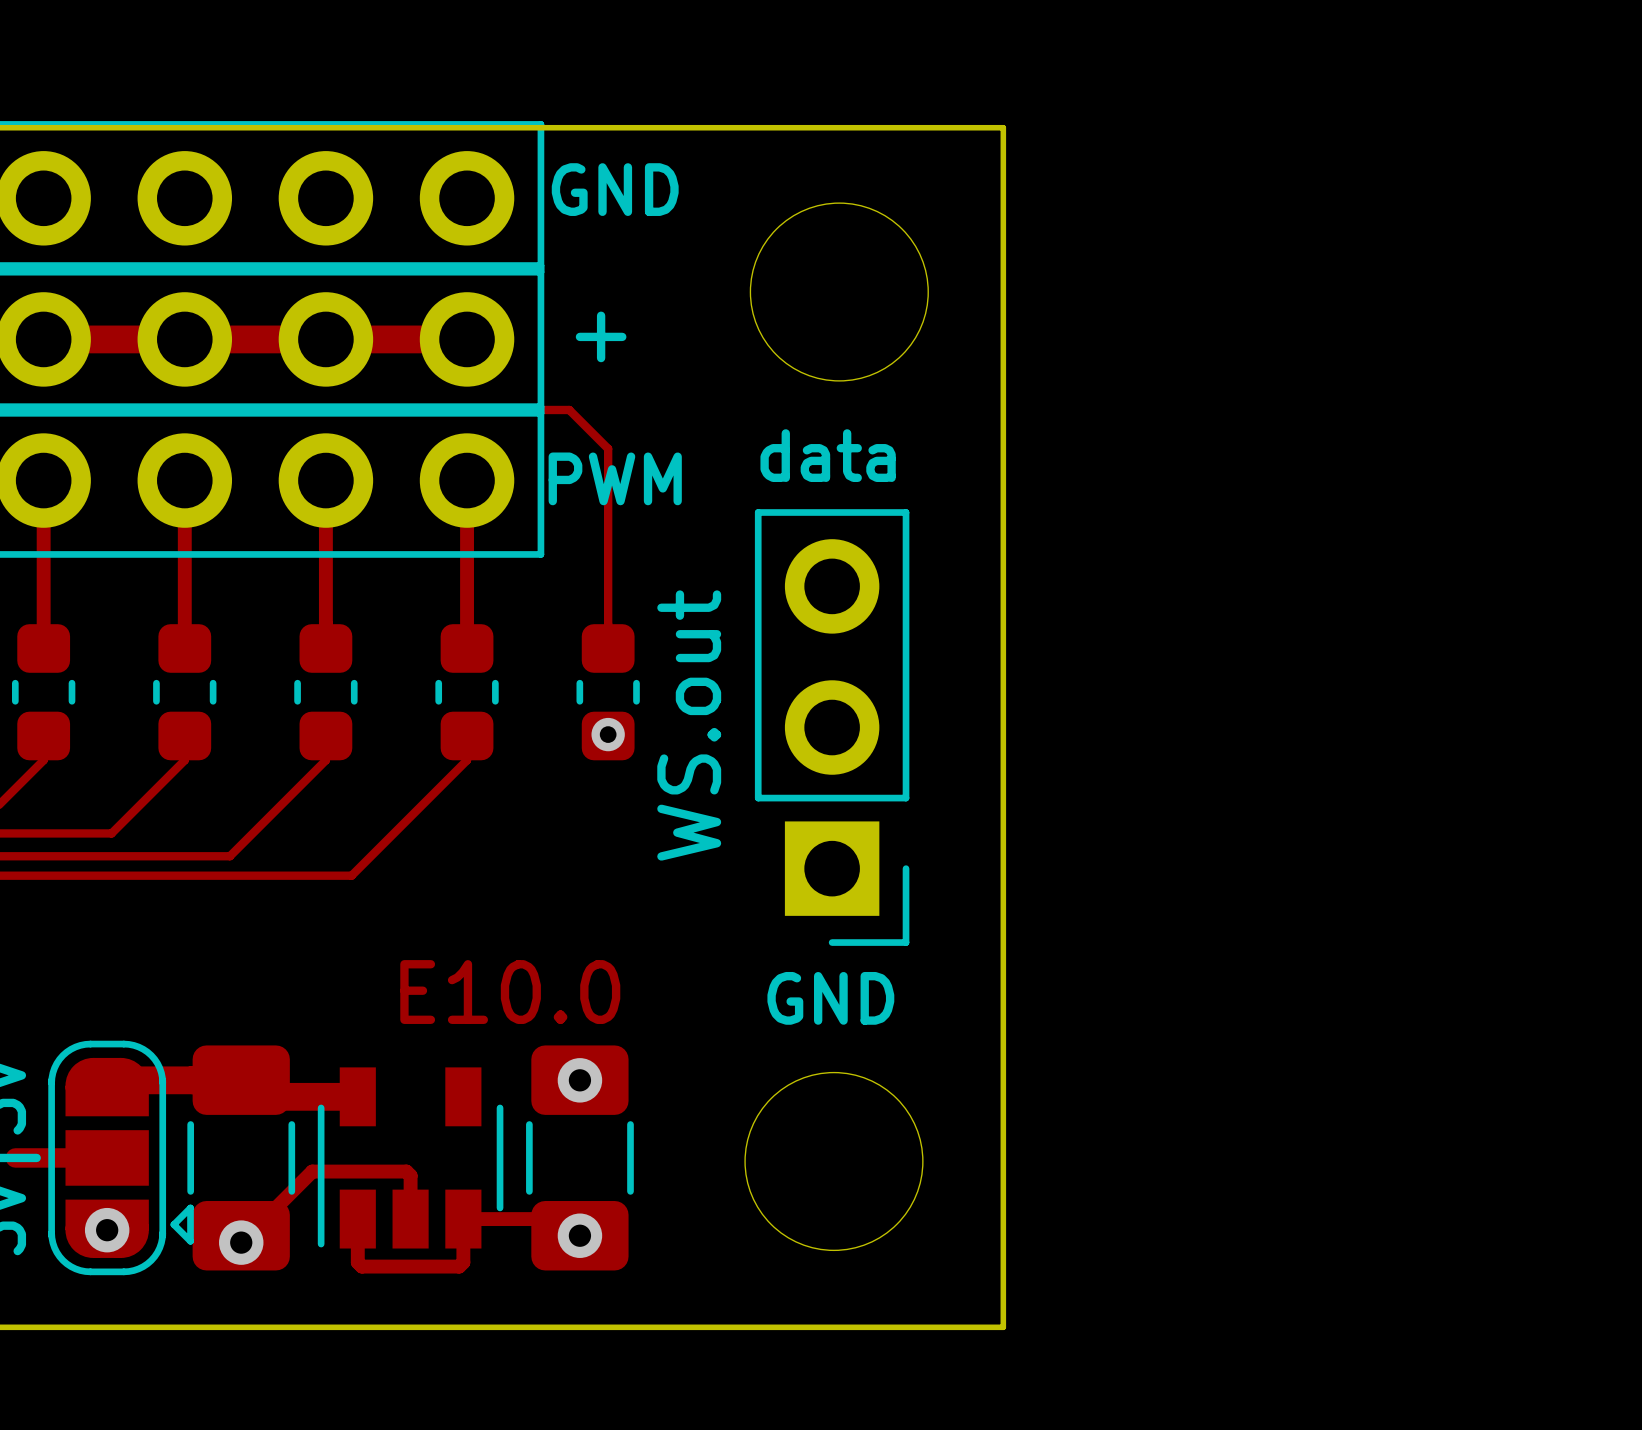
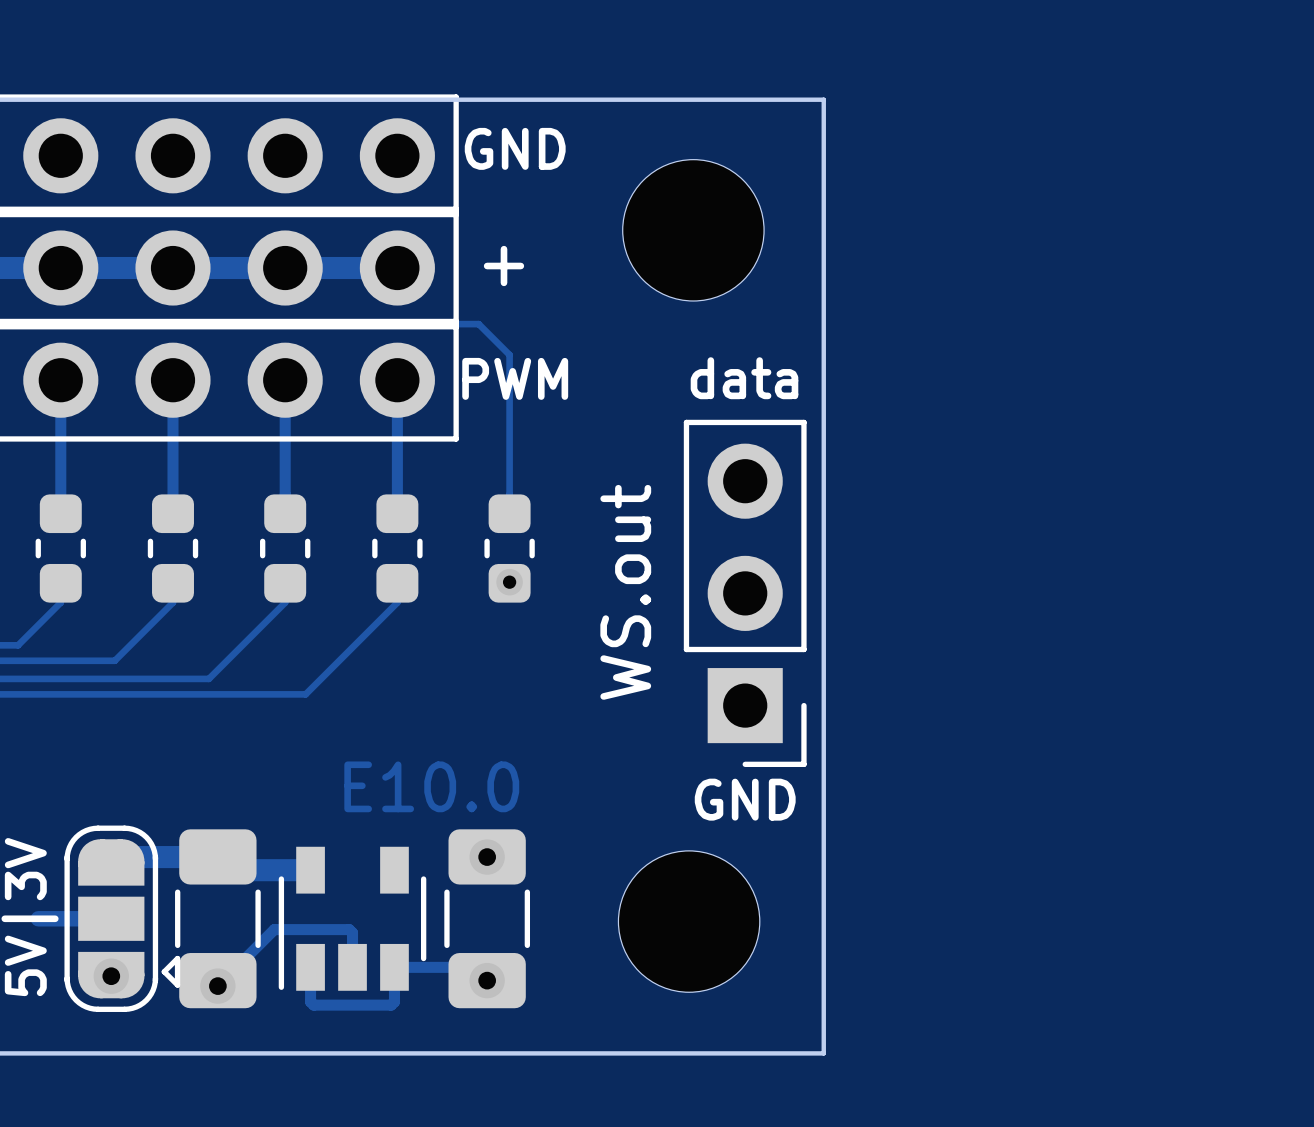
text position: data (828, 455) -> data (744, 378)
text position: WS.out (689, 725) -> WS.out (625, 592)
part position: (832, 727) -> (745, 593)
text position: GND (830, 998) -> GND (745, 799)

